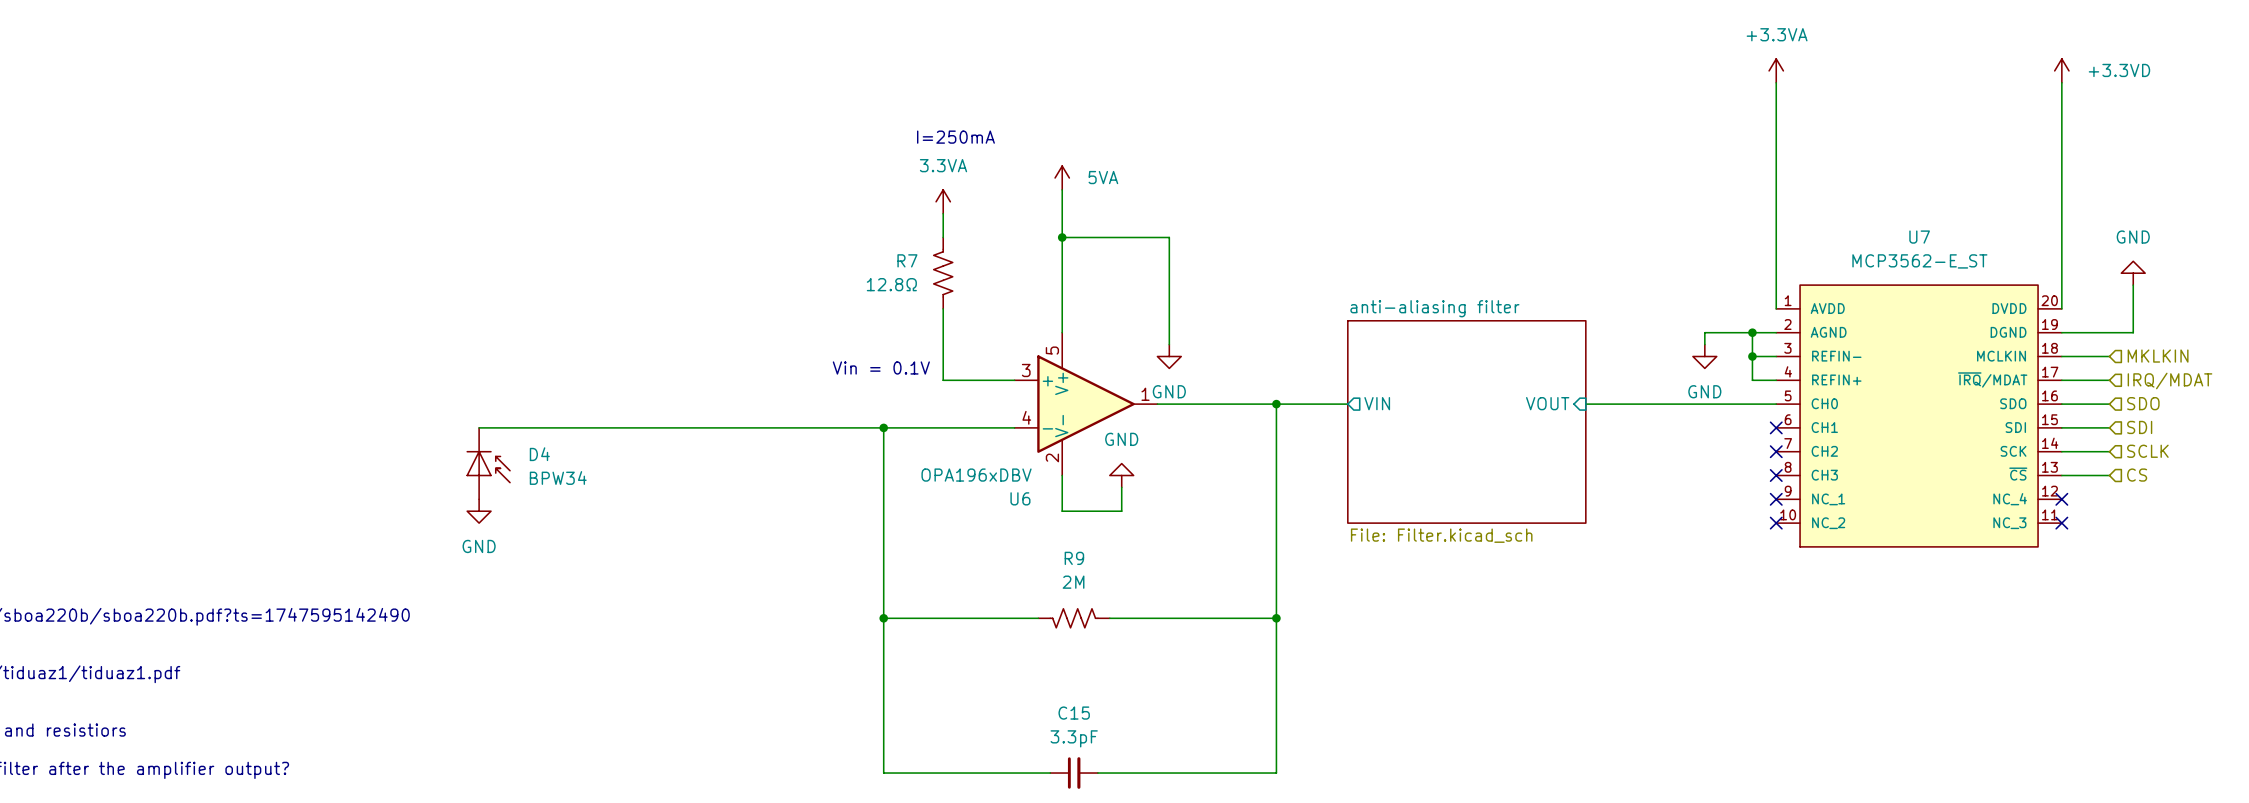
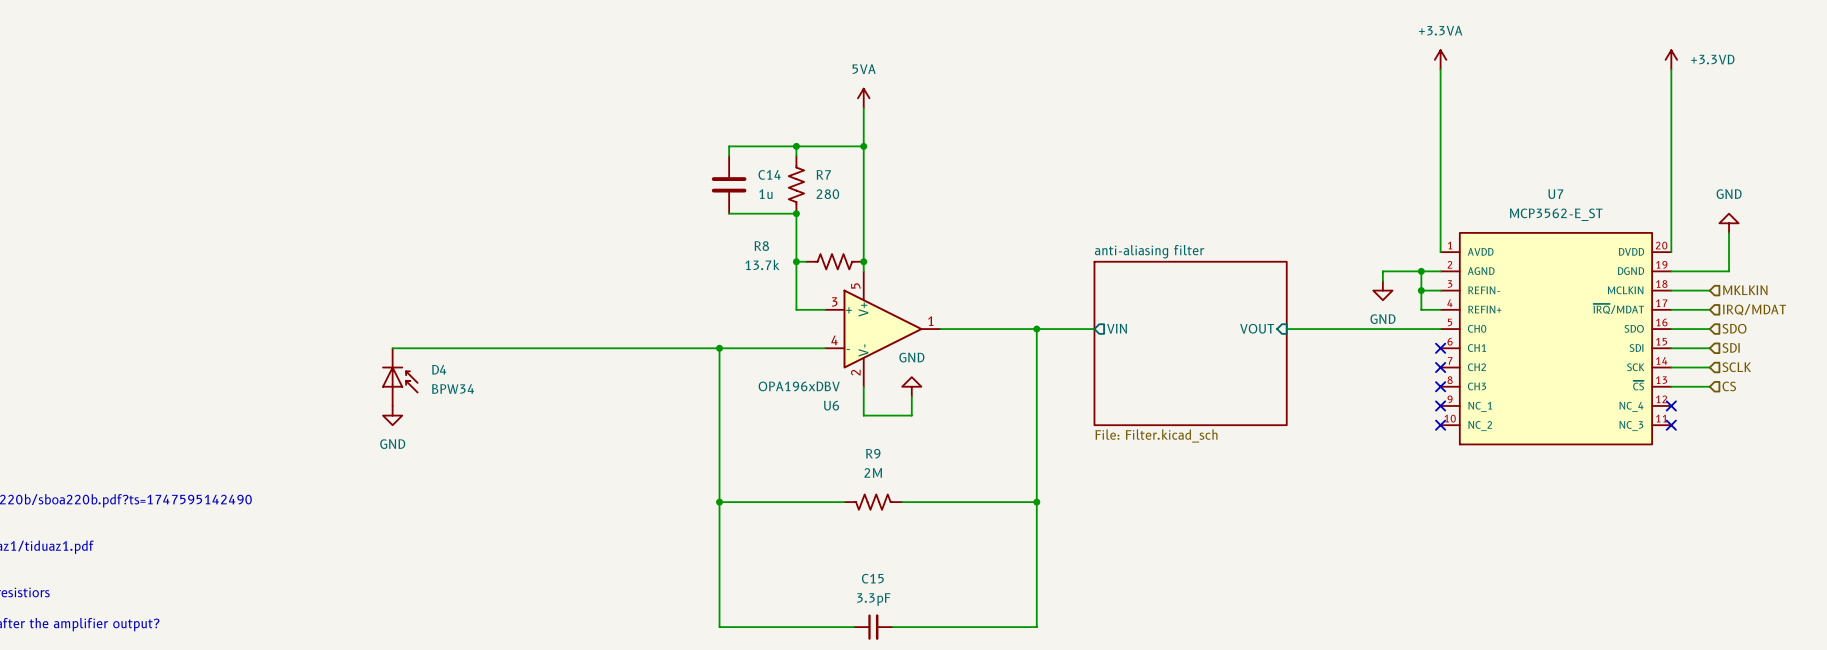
wire: none -> (863, 107) (863, 155)
text: I=250mA (955, 137) -> none
power symbol text position: 5VA (1103, 177) -> 5VA (864, 69)
wire: none -> (796, 146) (796, 155)
junction: none -> (796, 146)
wire: none -> (863, 146) (729, 146) (729, 155)
junction: none -> (863, 146)
power symbol position: 5VA (1062, 178) -> 5VA (863, 98)
power symbol: 3.3VA (943, 201) -> none
wire: (943, 213) (943, 237) -> none
C14: none -> 1u (729, 184)
wire: (1062, 237) (1169, 237) (1169, 344) -> none
junction: (1062, 237) -> none
junction: none -> (796, 213)
R7 flip: as is (943, 273) -> left-right (796, 184)
R7 position: (943, 273) -> (796, 184)
R7 value: 12.8Ω (891, 284) -> 280 (827, 194)
wire: (943, 308) (943, 380) (978, 380) -> (729, 213) (796, 213) (796, 309)
wire: none -> (796, 261) (806, 261)
junction: none -> (796, 261)
R8: none -> 13.7k (834, 261)
junction: none -> (863, 261)
power symbol: GND (1169, 356) -> none
text: Vin = 0.1V (881, 367) -> none

